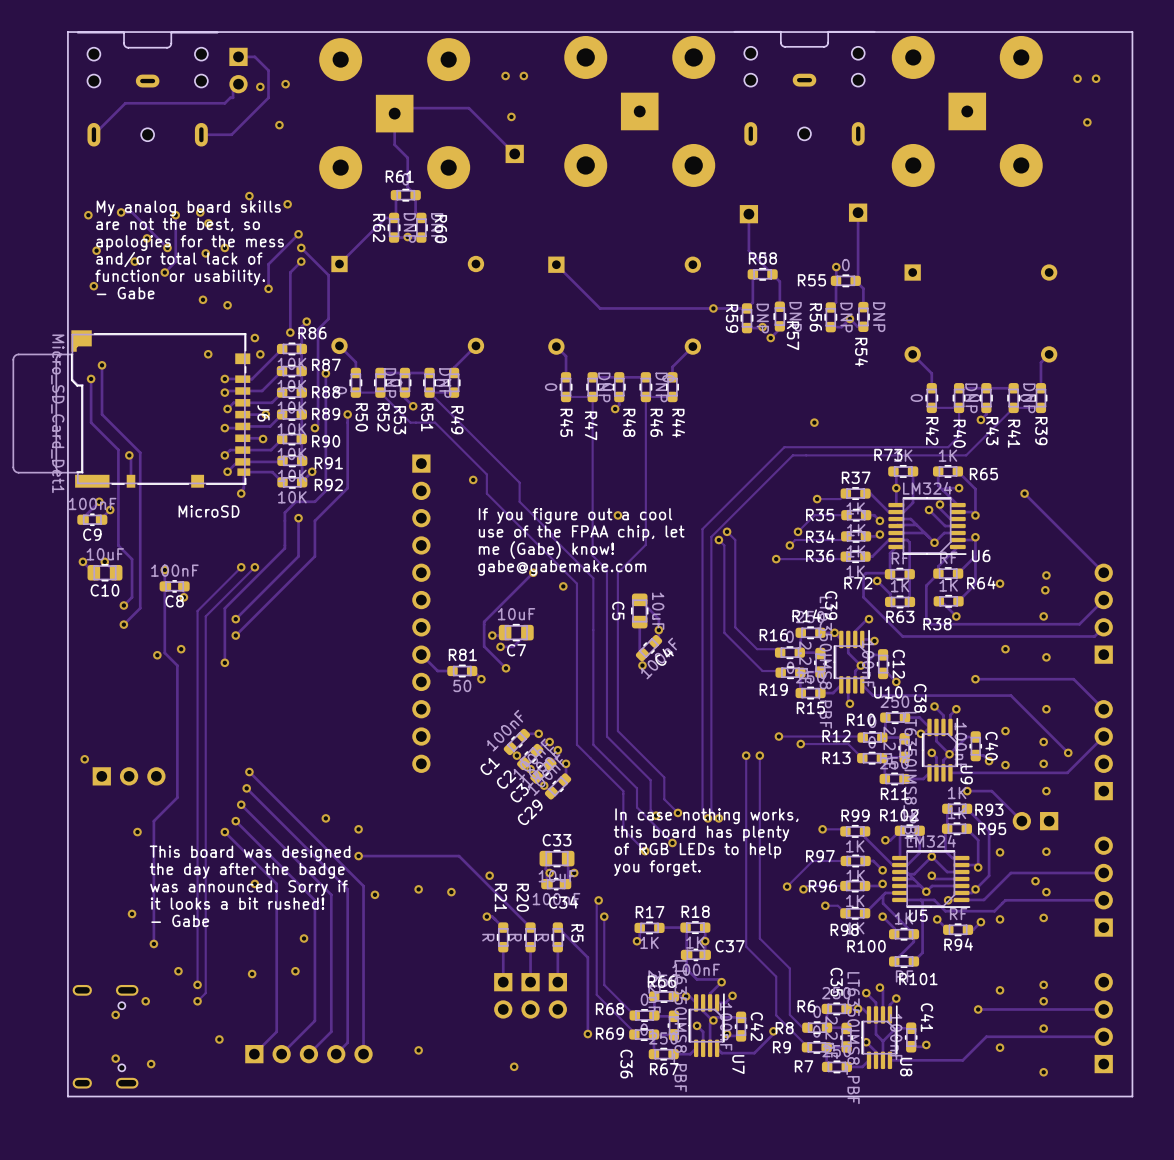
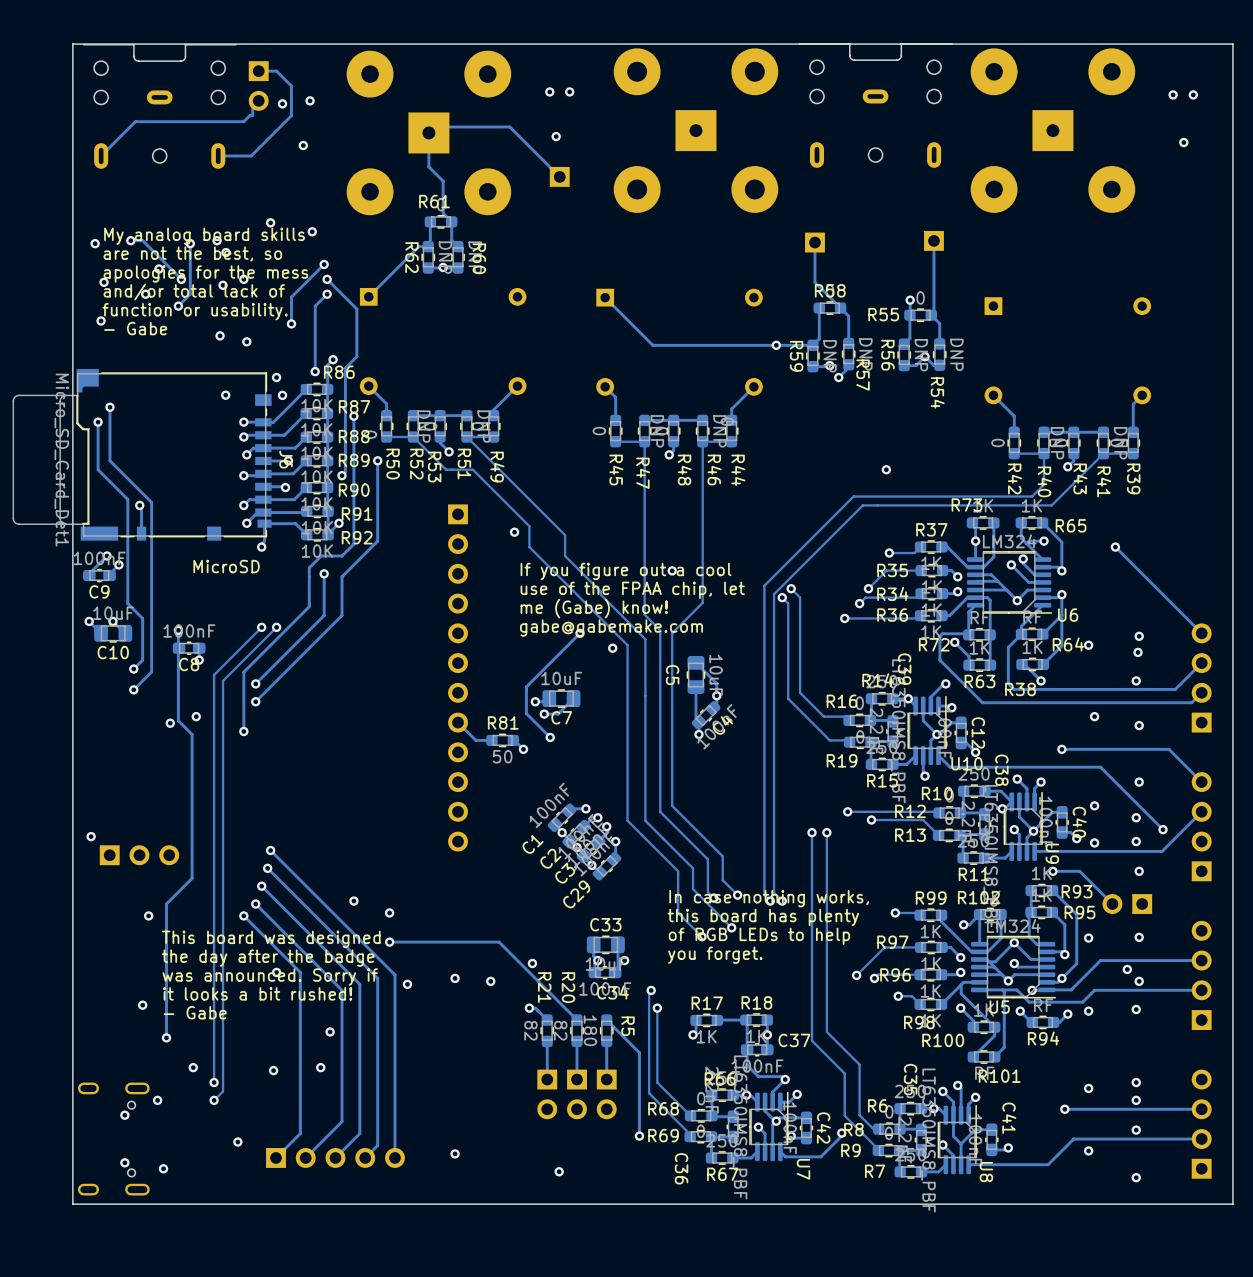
R21 value: R (488, 937) -> 82 (530, 1030)
R20 value: R (515, 937) -> 82 (560, 1030)
R5 value: R (542, 937) -> 180 (590, 1030)

